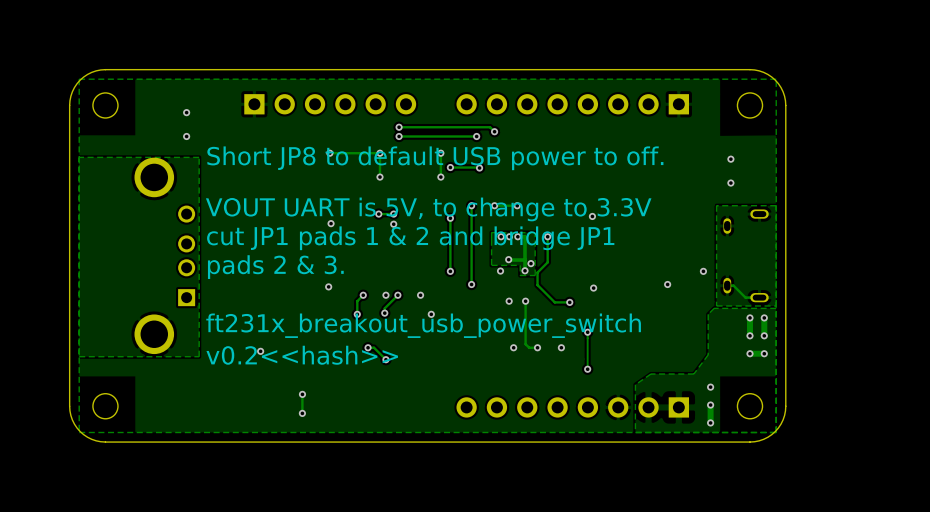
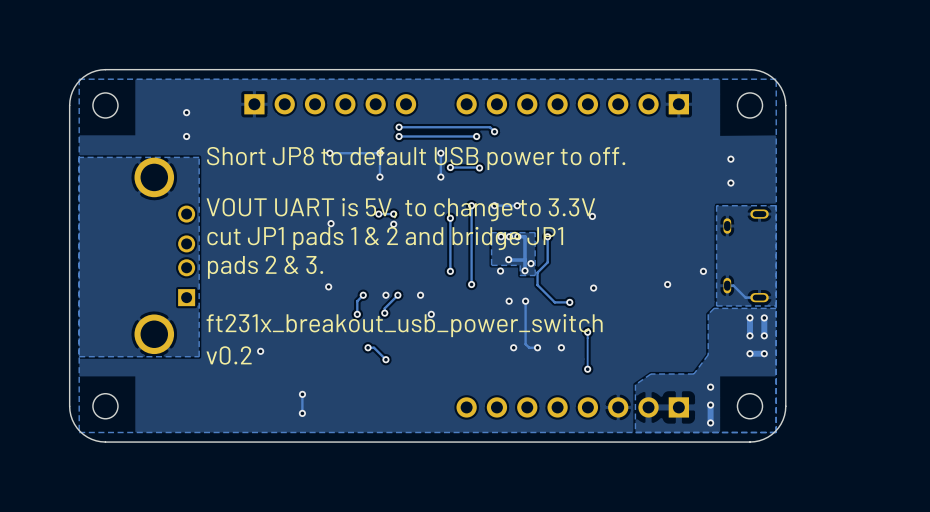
text: v0.2<<hash>> (302, 355) -> v0.2 (229, 355)

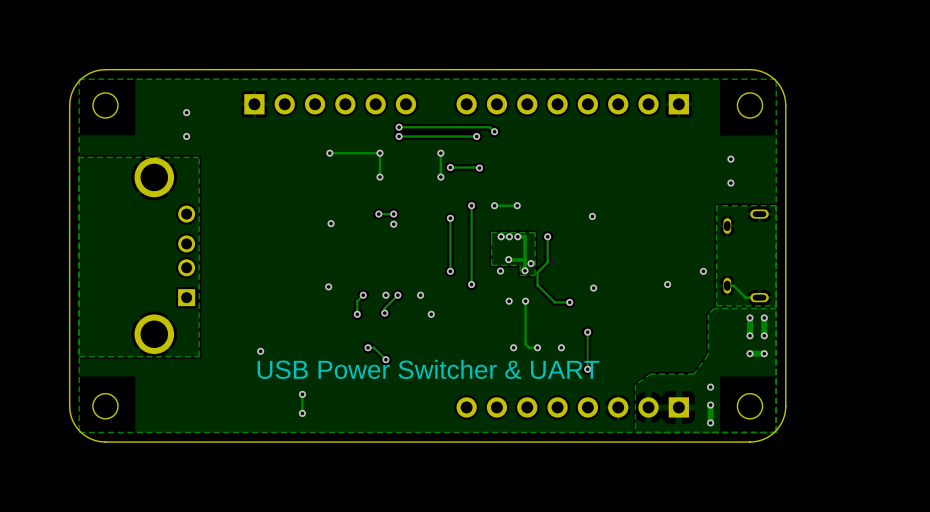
text: Short JP8 to default USB power to off. (416, 158) -> none
text: VOUT UART is 5V, to change to 3.3V (400, 209) -> none
text: cut JP1 pads 1 & 2 and bridge JP1 (385, 238) -> none
text: pads 2 & 3. (265, 267) -> none
text: ft231x_breakout_usb_power_switch (404, 325) -> none
text: v0.2 (229, 355) -> none
text: none -> USB Power Switcher & UART (428, 369)

